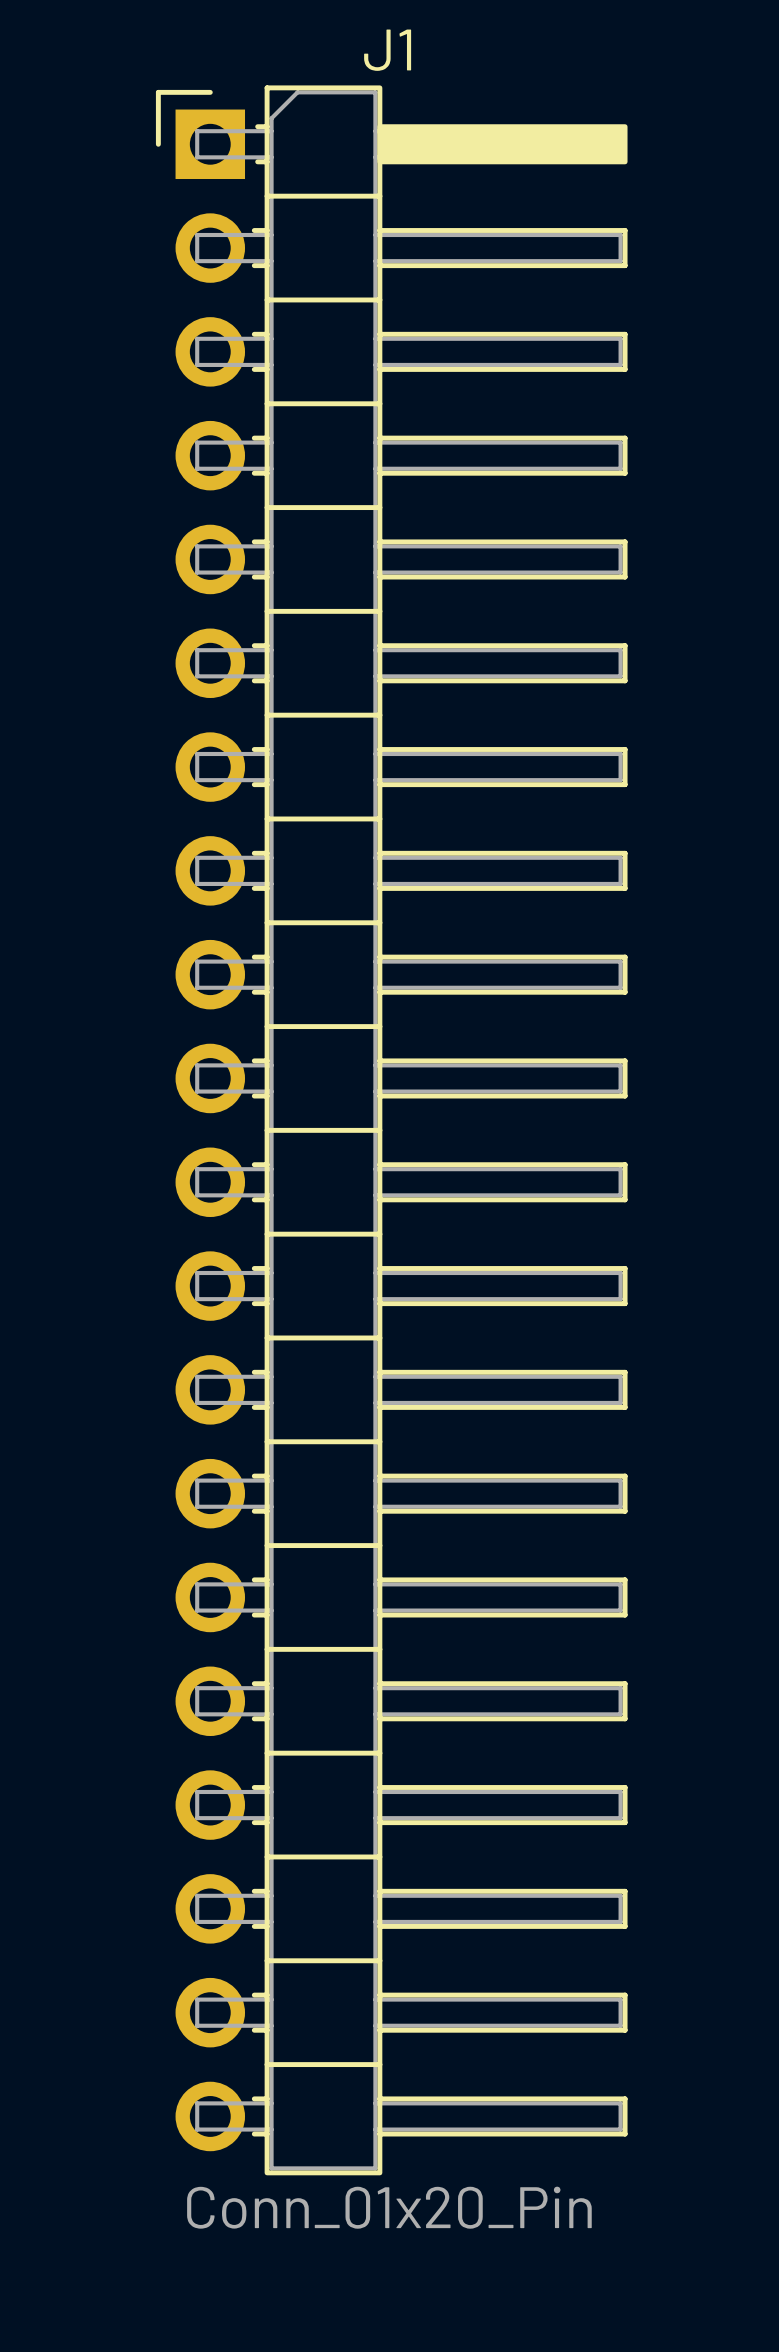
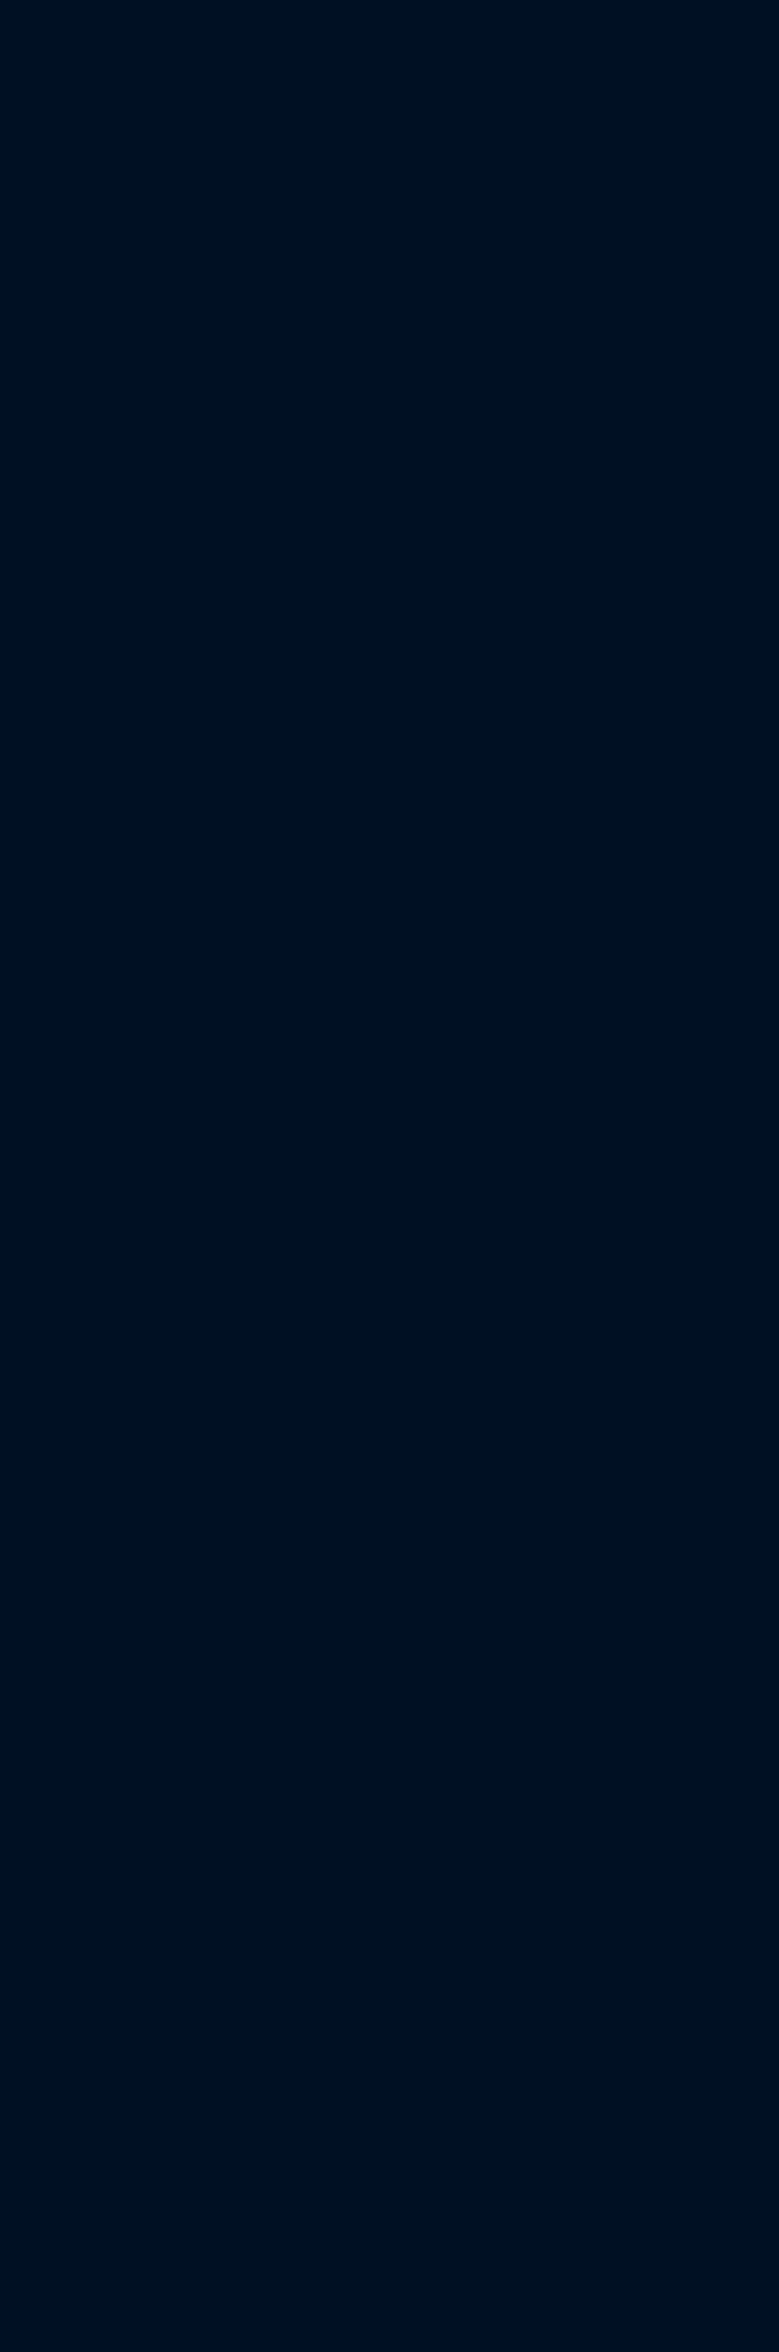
J1: Conn_01x20_Pin (391, 1130) -> none

